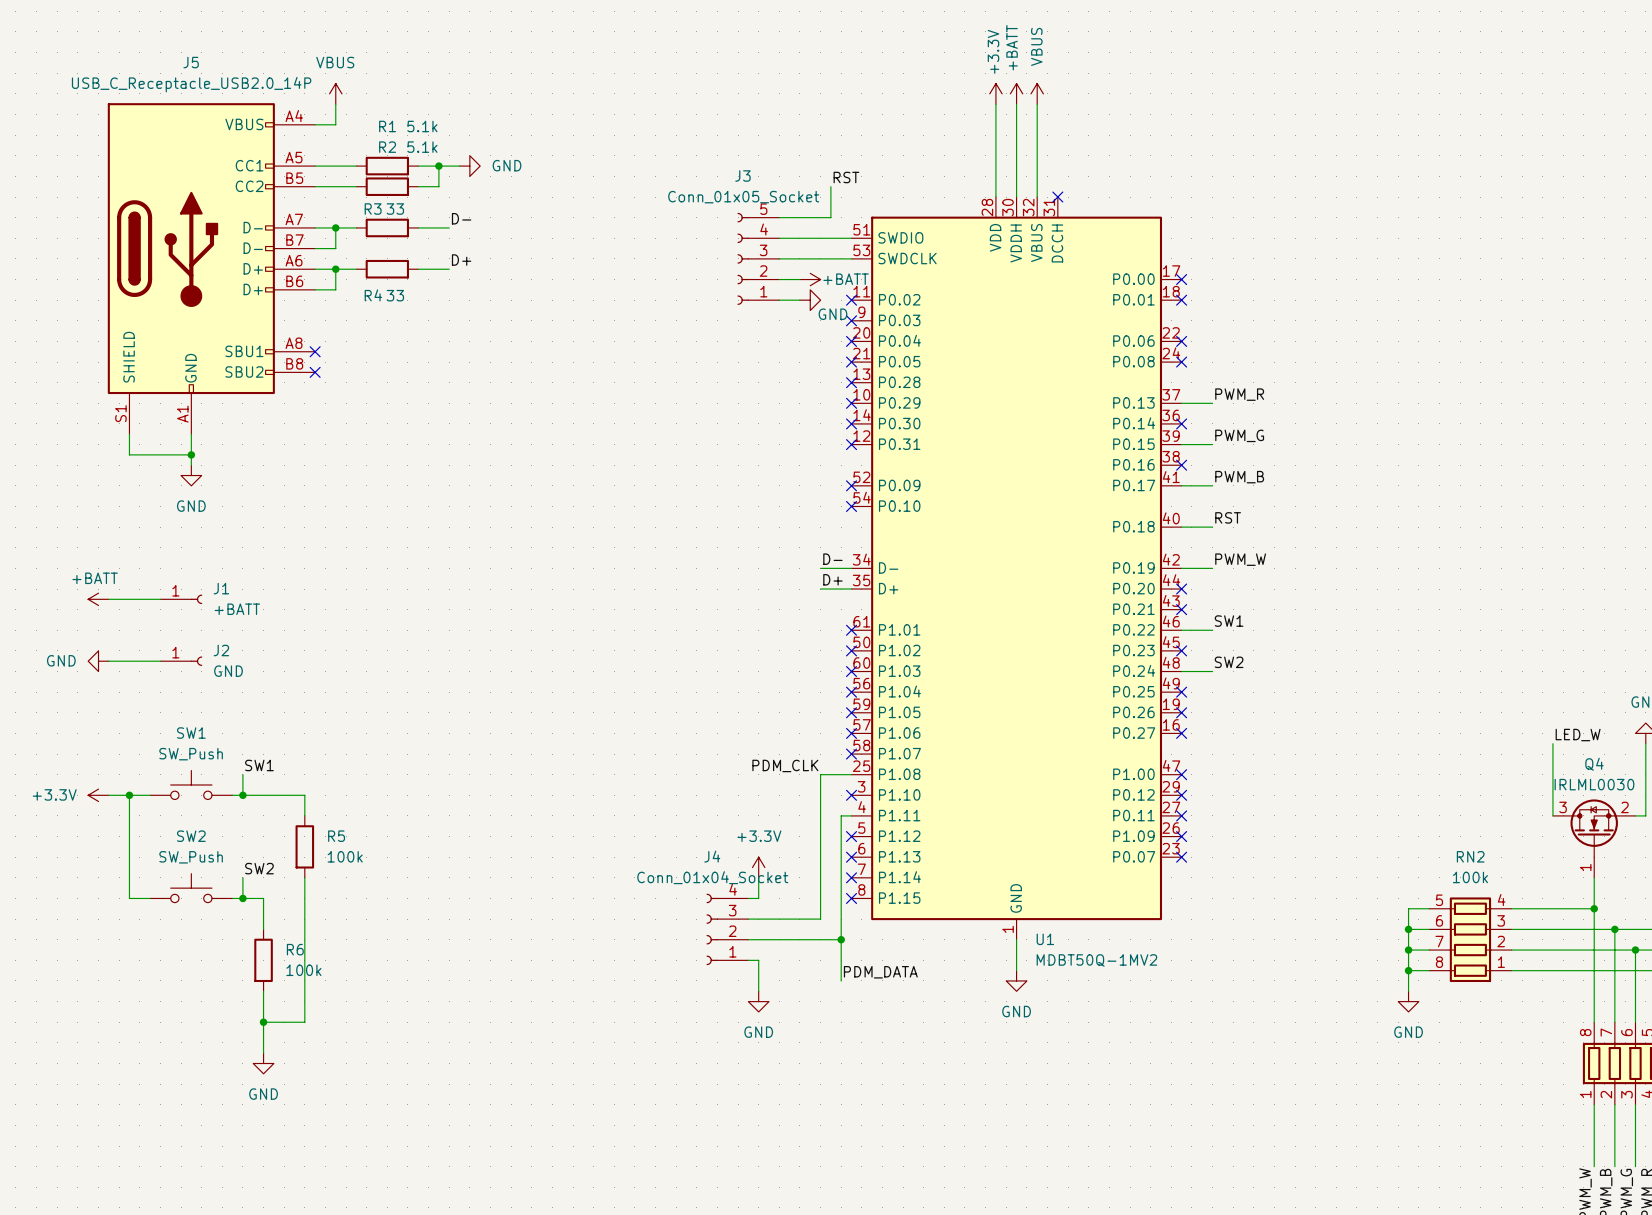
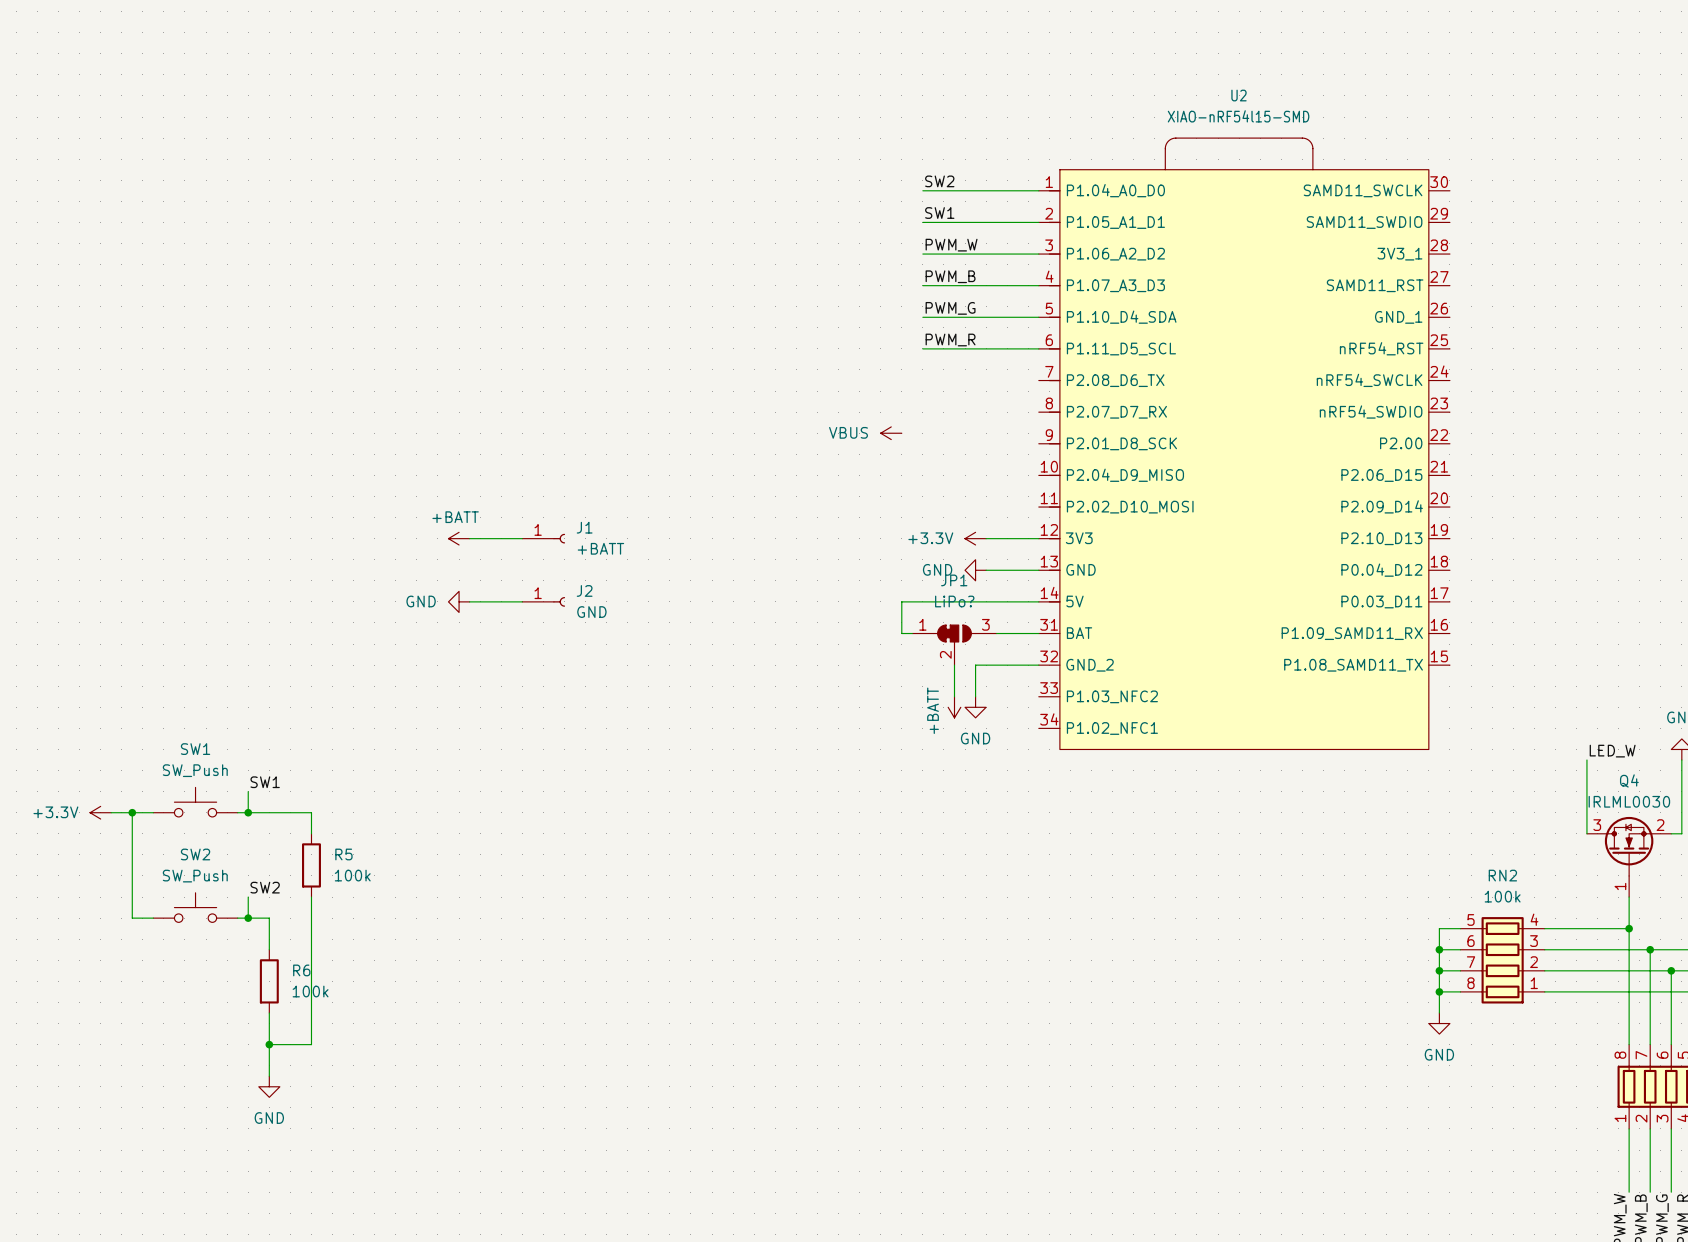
power symbol: VBUS (335, 93) -> none
power symbol: +3.3V (995, 93) -> none
power symbol: +BATT (1016, 93) -> none
power symbol: VBUS (1037, 93) -> none
wire: (335, 104) (335, 124) (315, 124) -> none
wire: (995, 104) (995, 197) -> none
wire: (1016, 104) (1016, 197) -> none
wire: (1037, 104) (1037, 197) -> none
wire: (315, 166) (356, 166) -> none
R1: 5.1k (387, 166) -> none
wire: (418, 166) (459, 166) -> none
wire: (438, 166) (438, 186) (418, 186) -> none
junction: (438, 166) -> none
power symbol: GND (469, 166) -> none
label: RST (846, 177) -> none
label: none -> SW2 (939, 181)
wire: (315, 186) (356, 186) -> none
R2: 5.1k (387, 186) -> none
wire: (830, 186) (830, 217) (779, 217) -> none
wire: none -> (922, 190) (1038, 190)
no-connect mark: (1057, 197) -> none
label: none -> SW1 (939, 213)
label: D- (461, 218) -> none
wire: (315, 227) (356, 227) -> none
wire: (335, 227) (335, 248) (315, 248) -> none
junction: (335, 227) -> none
R3: 33 (387, 227) -> none
wire: (418, 227) (449, 227) -> none
wire: (779, 238) (851, 238) -> none
label: none -> PWM_W (951, 245)
J3: Conn_01x05_Socket (758, 258) -> none
wire: (779, 258) (851, 258) -> none
label: D+ (461, 260) -> none
J5: USB_C_Receptacle_USB2.0_14P (211, 268) -> none
wire: (315, 269) (356, 269) -> none
wire: (335, 269) (335, 289) (315, 289) -> none
junction: (335, 269) -> none
R4: 33 (387, 269) -> none
wire: (418, 269) (449, 269) -> none
label: none -> PWM_B (950, 276)
wire: (779, 279) (799, 279) -> none
power symbol: +BATT (810, 279) -> none
no-connect mark: (1181, 279) -> none
wire: (779, 300) (799, 300) -> none
power symbol: GND (810, 300) -> none
no-connect mark: (851, 300) -> none
no-connect mark: (1181, 300) -> none
label: none -> PWM_G (950, 308)
no-connect mark: (851, 320) -> none
label: none -> PWM_R (950, 340)
no-connect mark: (851, 341) -> none
no-connect mark: (1181, 341) -> none
no-connect mark: (315, 351) -> none
no-connect mark: (851, 362) -> none
no-connect mark: (1181, 362) -> none
no-connect mark: (315, 372) -> none
no-connect mark: (851, 382) -> none
label: PWM_R (1239, 394) -> none
no-connect mark: (851, 403) -> none
no-connect mark: (851, 423) -> none
power symbol: none -> VBUS (891, 433)
no-connect mark: (1181, 423) -> none
wire: (129, 434) (129, 454) (191, 454) -> none
wire: (191, 434) (191, 465) -> none
U2: none -> XIAO-nRF54l15-SMD (1244, 443)
label: PWM_G (1239, 435) -> none
no-connect mark: (851, 444) -> none
junction: (191, 454) -> none
no-connect mark: (1181, 465) -> none
power symbol: GND (191, 475) -> none
label: PWM_B (1239, 477) -> none
no-connect mark: (851, 485) -> none
no-connect mark: (851, 506) -> none
label: RST (1228, 517) -> none
power symbol: none -> +BATT (459, 538)
wire: none -> (469, 538) (522, 538)
power symbol: none -> +3.3V (975, 538)
power symbol: none -> GND (975, 570)
label: D- (832, 559) -> none
label: PWM_W (1240, 559) -> none
wire: (820, 568) (851, 568) -> none
U1: MDBT50Q-1MV2 (1016, 568) -> none
label: D+ (832, 579) -> none
power symbol: none -> GND (459, 601)
wire: none -> (469, 601) (522, 601)
wire: (820, 589) (851, 589) -> none
no-connect mark: (1181, 589) -> none
power symbol: +BATT (98, 599) -> none
wire: (108, 599) (160, 599) -> none
J1 position: (181, 599) -> (543, 538)
no-connect mark: (1181, 609) -> none
label: SW1 (1229, 621) -> none
no-connect mark: (851, 630) -> none
JP1: none -> LiPo? (954, 645)
no-connect mark: (851, 650) -> none
no-connect mark: (1181, 650) -> none
power symbol: GND (98, 661) -> none
wire: (108, 661) (160, 661) -> none
J2 position: (181, 661) -> (543, 601)
label: SW2 (1229, 662) -> none
no-connect mark: (851, 671) -> none
no-connect mark: (851, 692) -> none
power symbol: none -> +BATT (954, 707)
power symbol: none -> GND (975, 707)
no-connect mark: (1181, 692) -> none
no-connect mark: (851, 712) -> none
no-connect mark: (1181, 712) -> none
no-connect mark: (851, 733) -> none
no-connect mark: (1181, 733) -> none
no-connect mark: (851, 754) -> none
label: PDM_CLK (785, 765) -> none
wire: (851, 774) (820, 774) (820, 919) (748, 919) -> none
no-connect mark: (1181, 774) -> none
no-connect mark: (851, 795) -> none
no-connect mark: (1181, 795) -> none
wire: (851, 815) (841, 815) (841, 980) -> none
no-connect mark: (1181, 815) -> none
no-connect mark: (851, 836) -> none
no-connect mark: (1181, 836) -> none
no-connect mark: (851, 857) -> none
no-connect mark: (1181, 857) -> none
power symbol: +3.3V (758, 867) -> none
wire: (758, 877) (758, 898) (748, 898) -> none
no-connect mark: (851, 877) -> none
no-connect mark: (851, 898) -> none
J4: Conn_01x04_Socket (727, 929) -> none
wire: (748, 939) (841, 939) -> none
junction: (841, 939) -> none
wire: (1016, 939) (1016, 970) -> none
wire: (748, 960) (758, 960) (758, 991) -> none
label: PDM_DATA (880, 972) -> none
power symbol: GND (1016, 980) -> none
power symbol: GND (758, 1001) -> none

